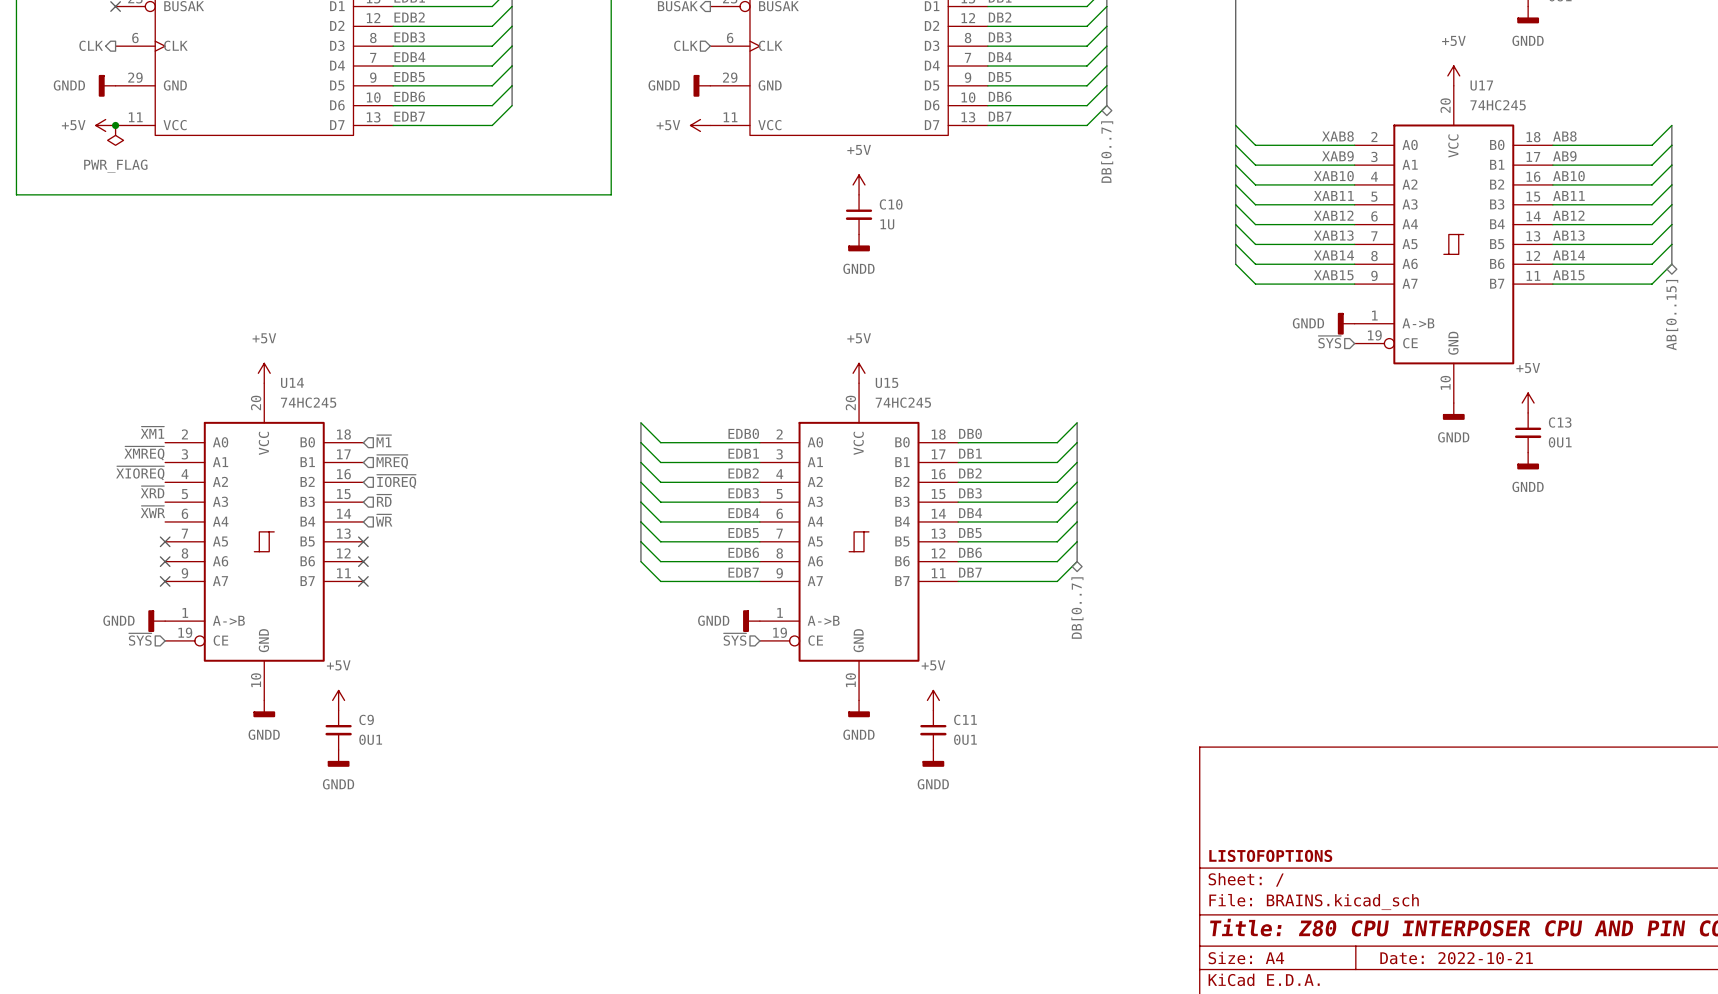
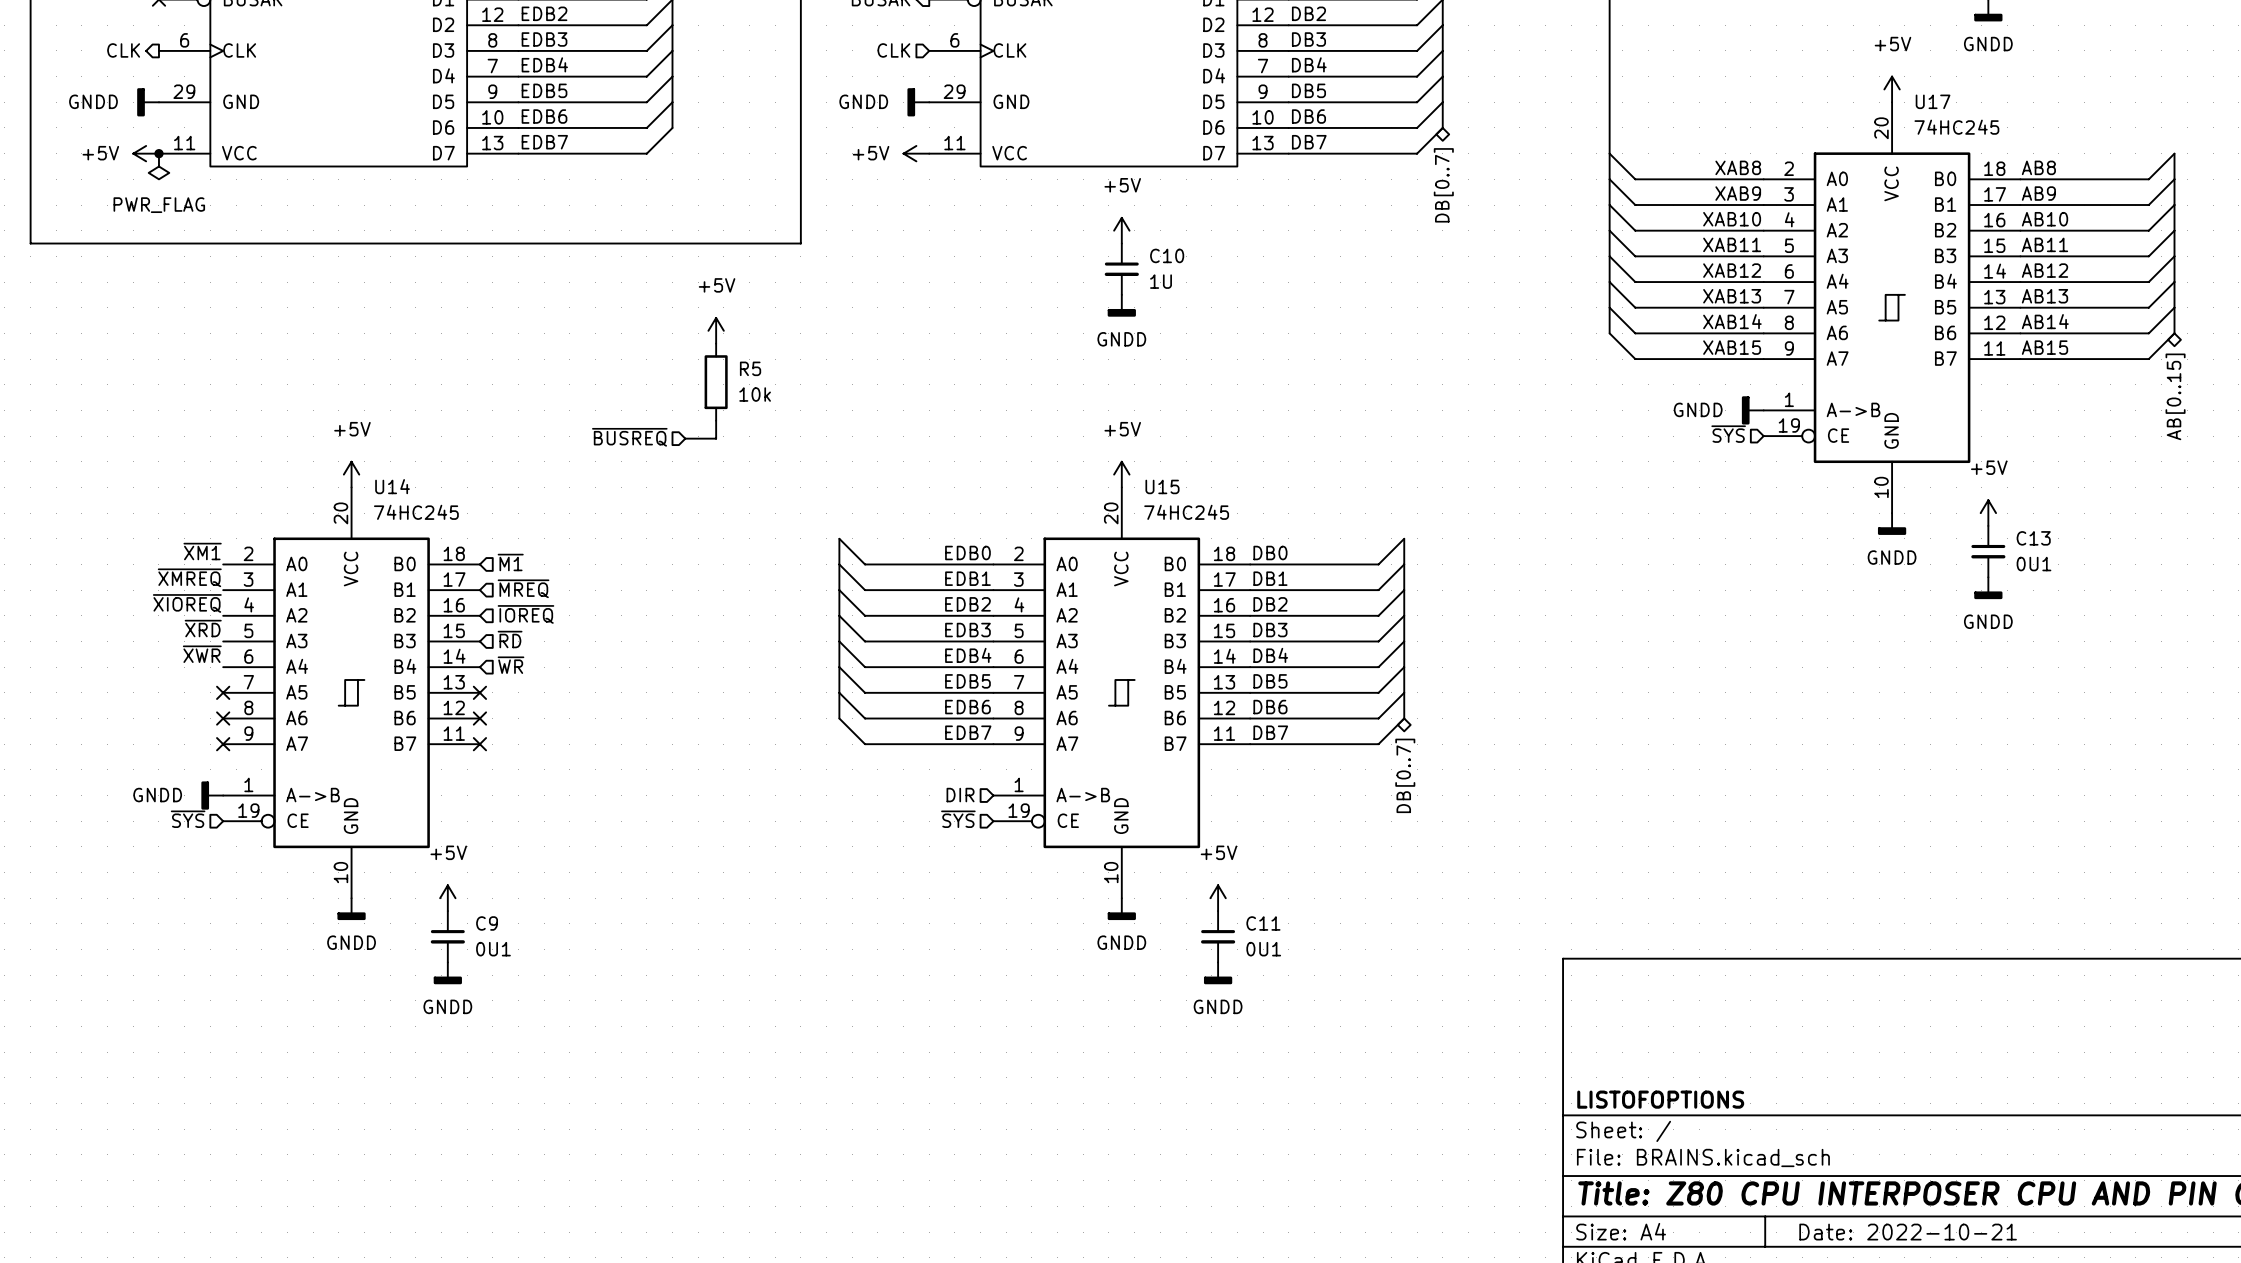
power symbol: none -> +5V (716, 330)
R5: none -> 10k (716, 382)
wire: none -> (716, 420) (716, 438) (685, 438)
hierarchical label: none -> ~{BUSREQ} (629, 437)
hierarchical label: none -> DIR (960, 795)
power symbol: GNDD (751, 621) -> none

